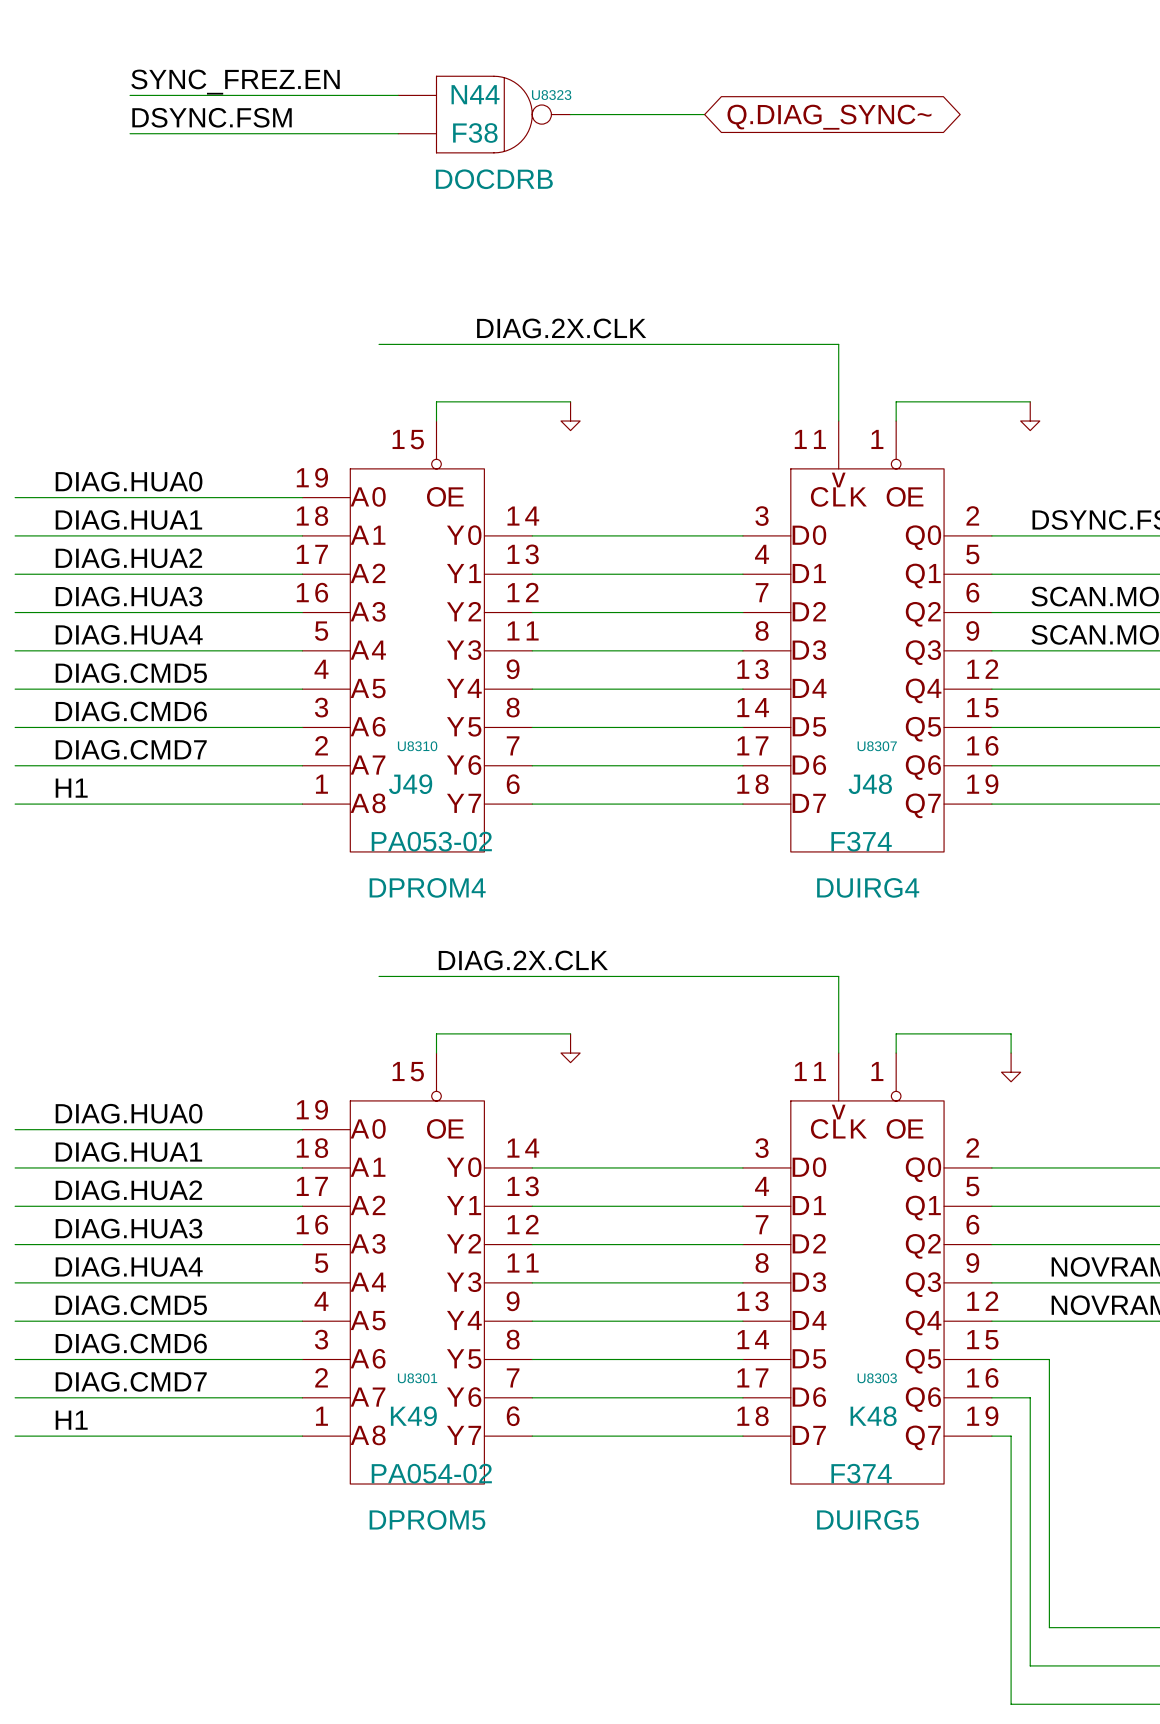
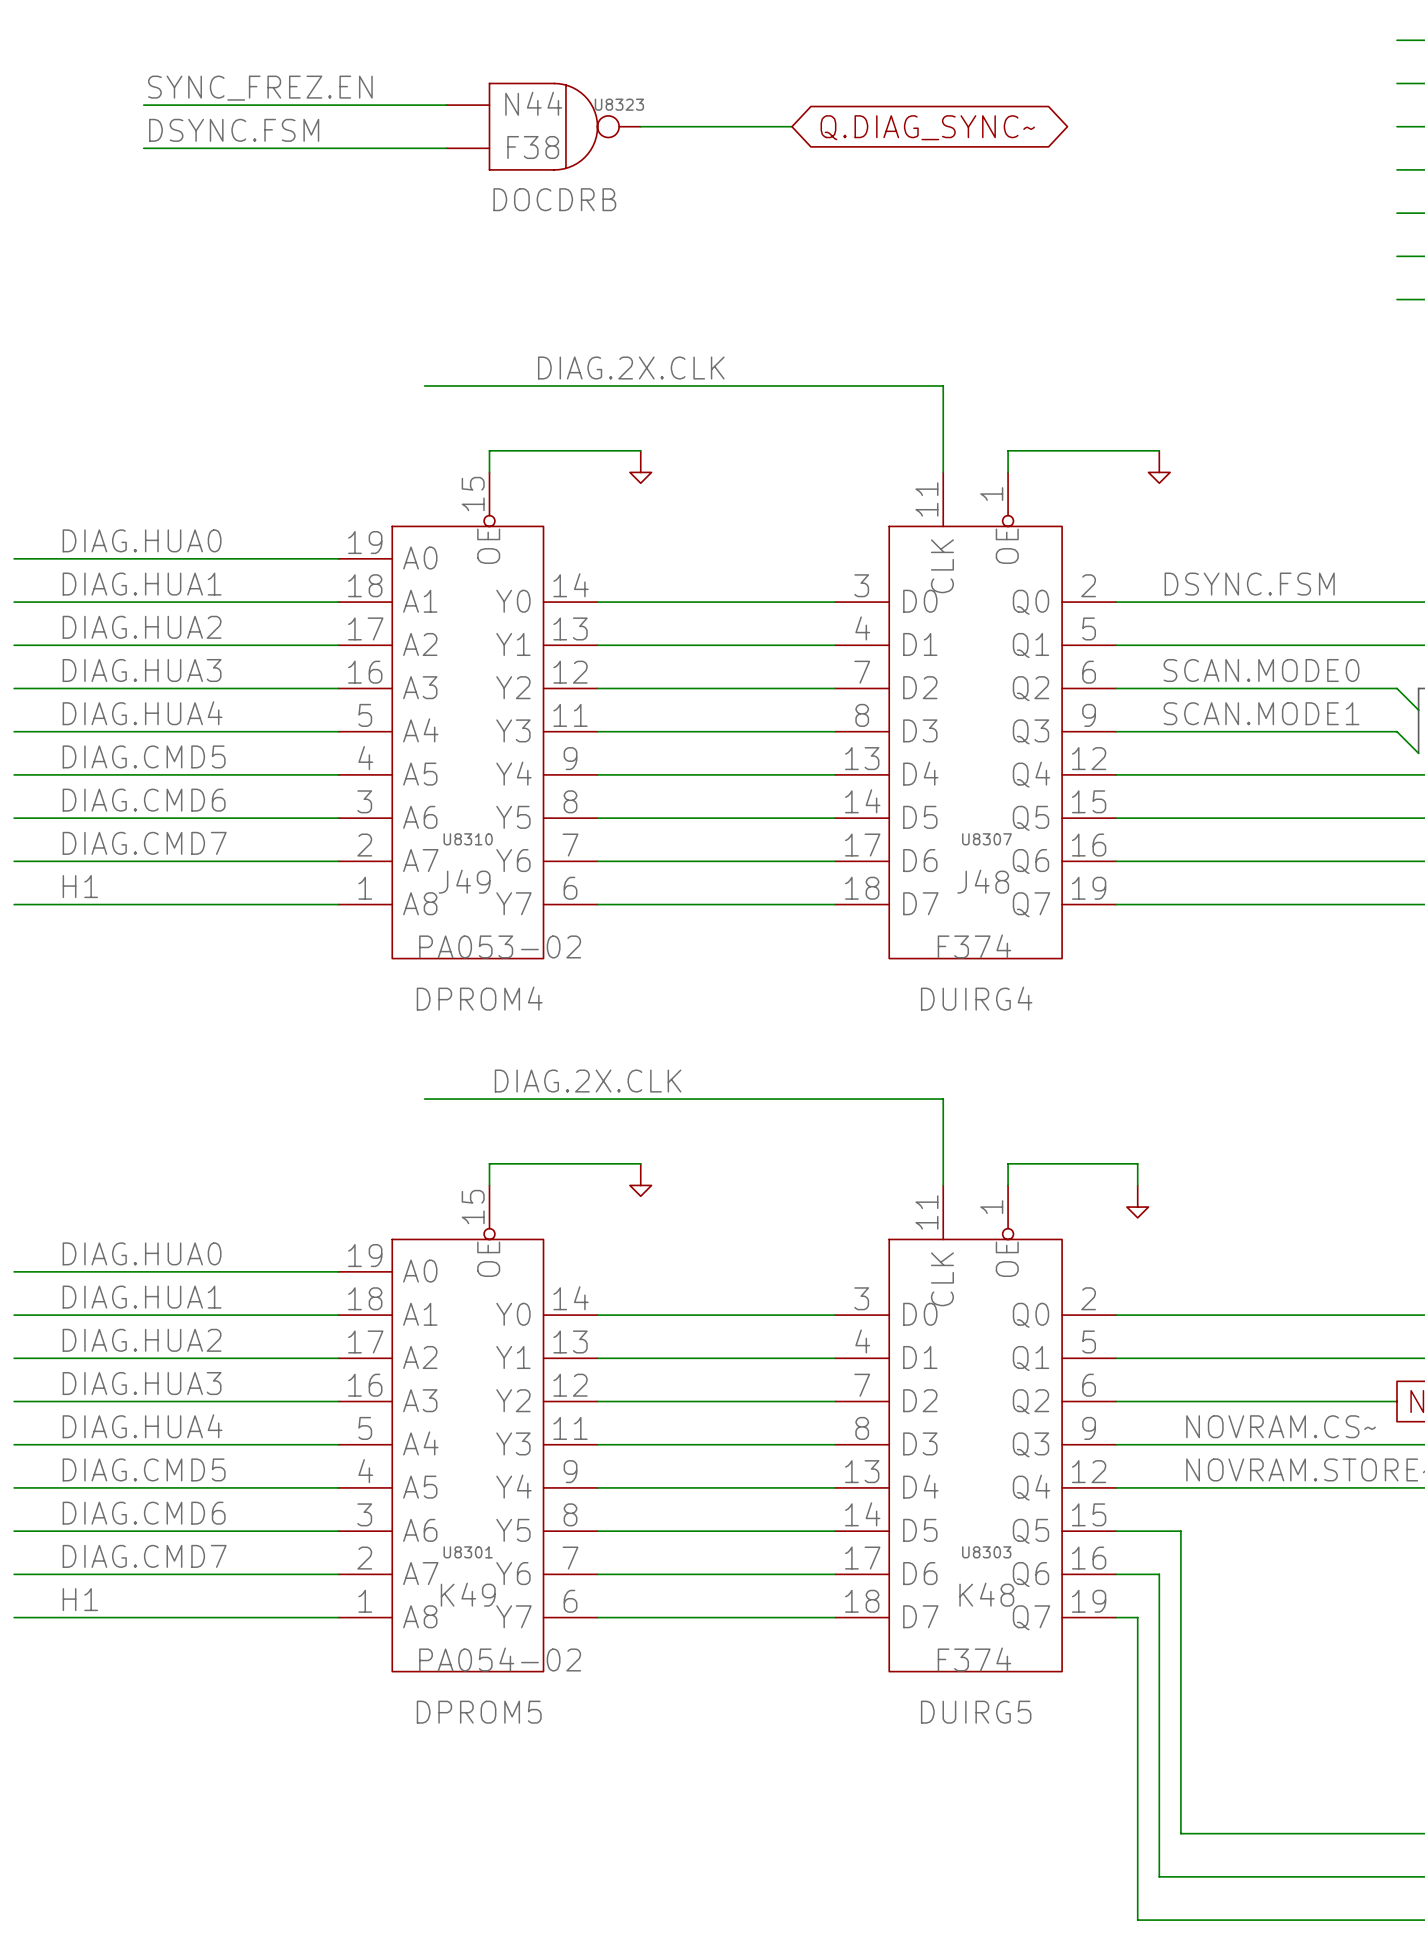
U8310 symbol: [302, 421, 533, 852] -> [338, 472, 598, 959]
U8307 symbol: [742, 421, 992, 852] -> [835, 472, 1117, 959]
U8301 symbol: [302, 1053, 533, 1485] -> [338, 1185, 598, 1672]
U8303 symbol: [742, 1053, 992, 1485] -> [835, 1185, 1117, 1672]

